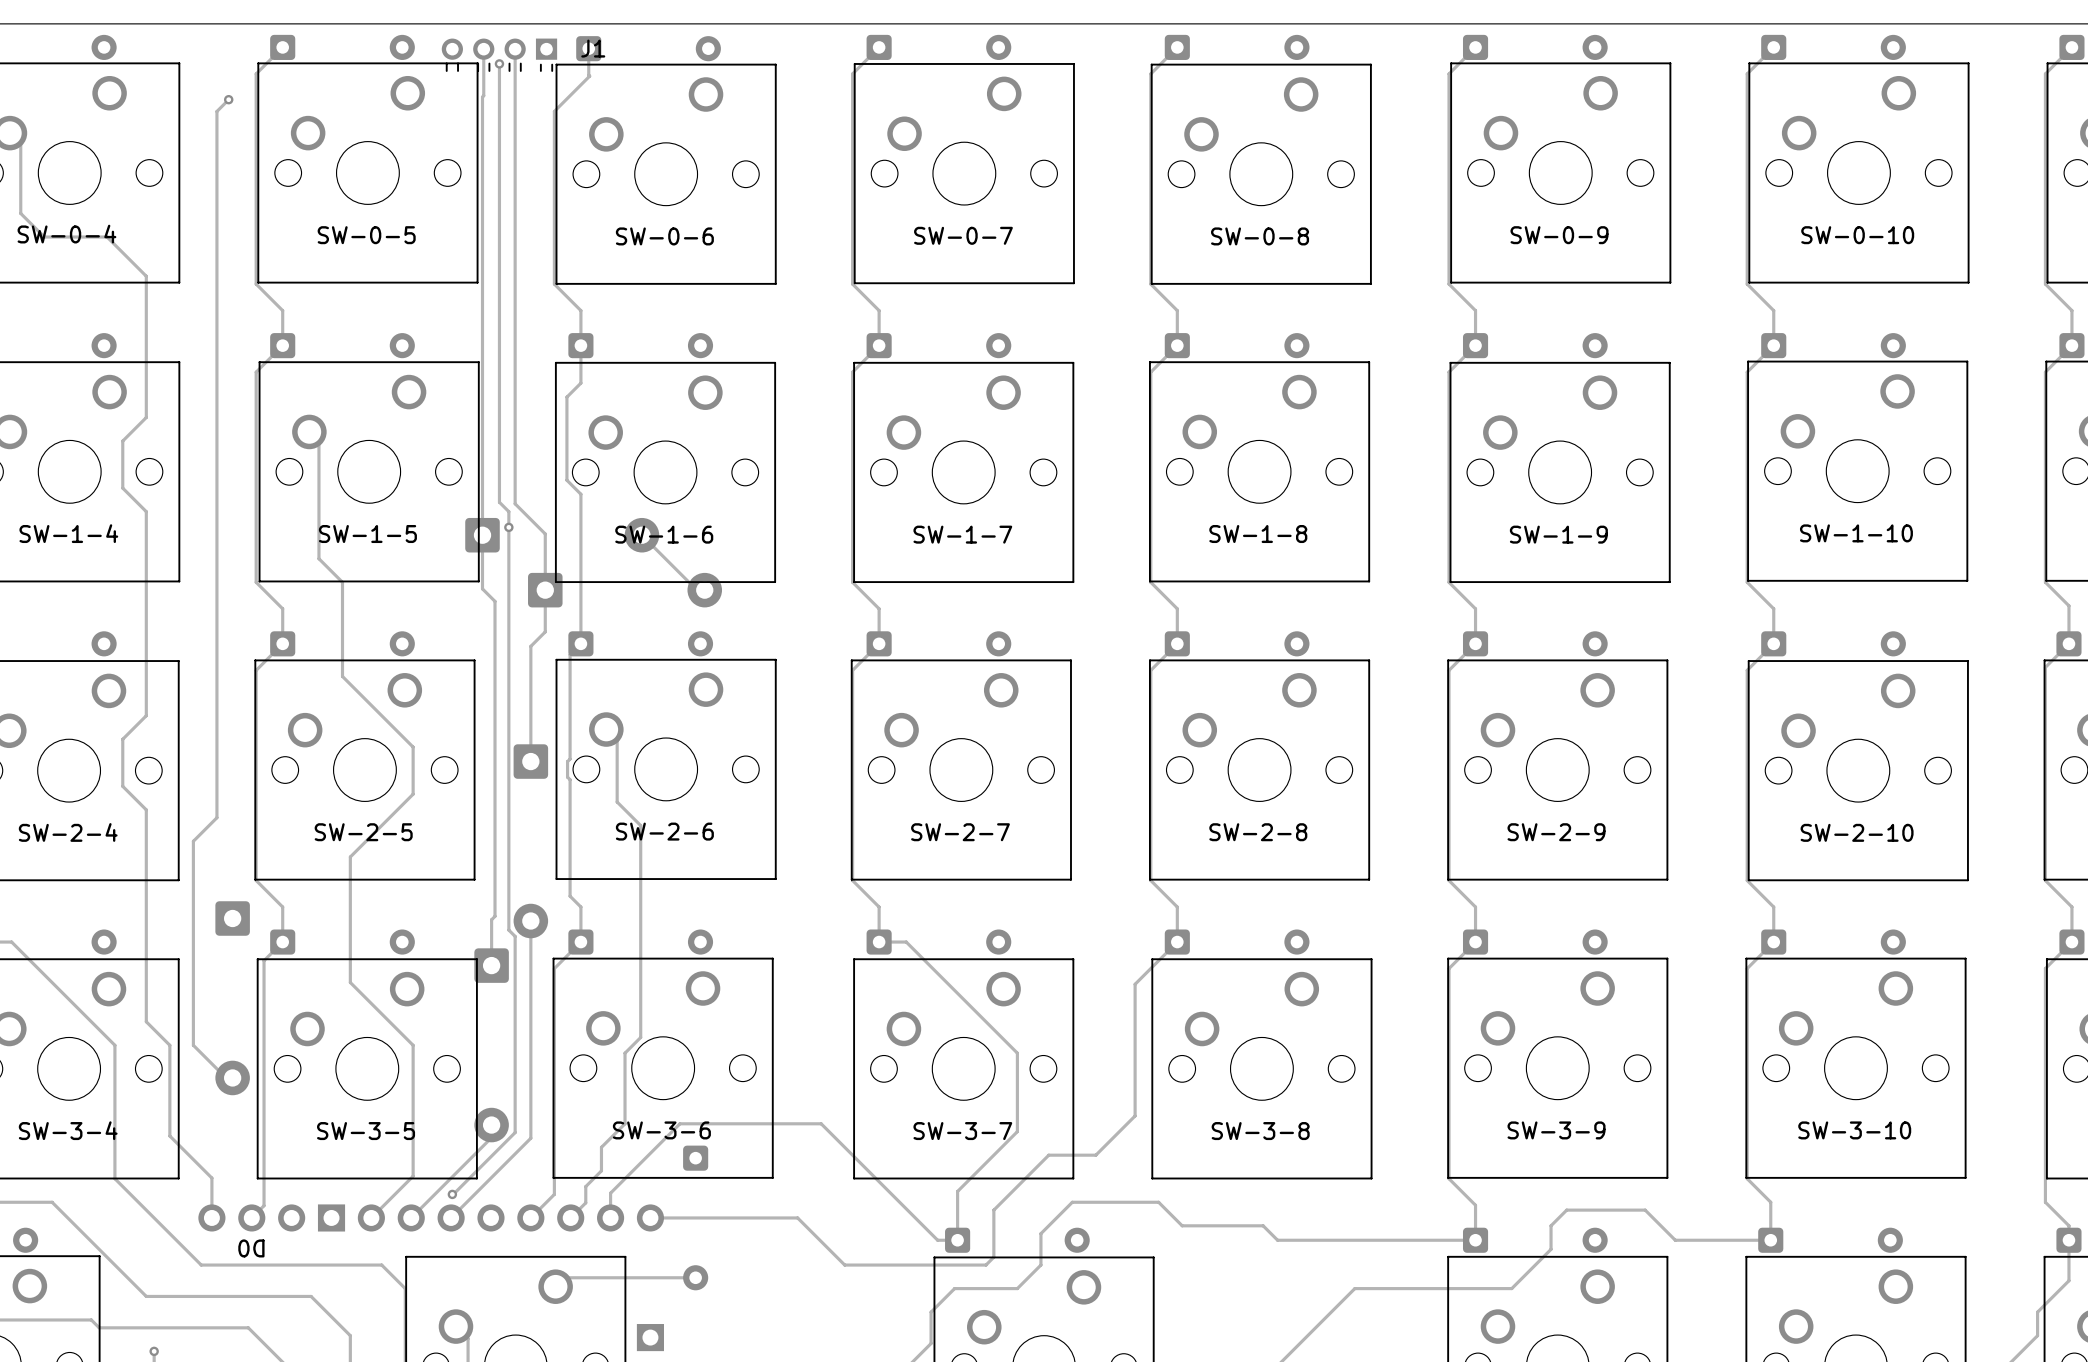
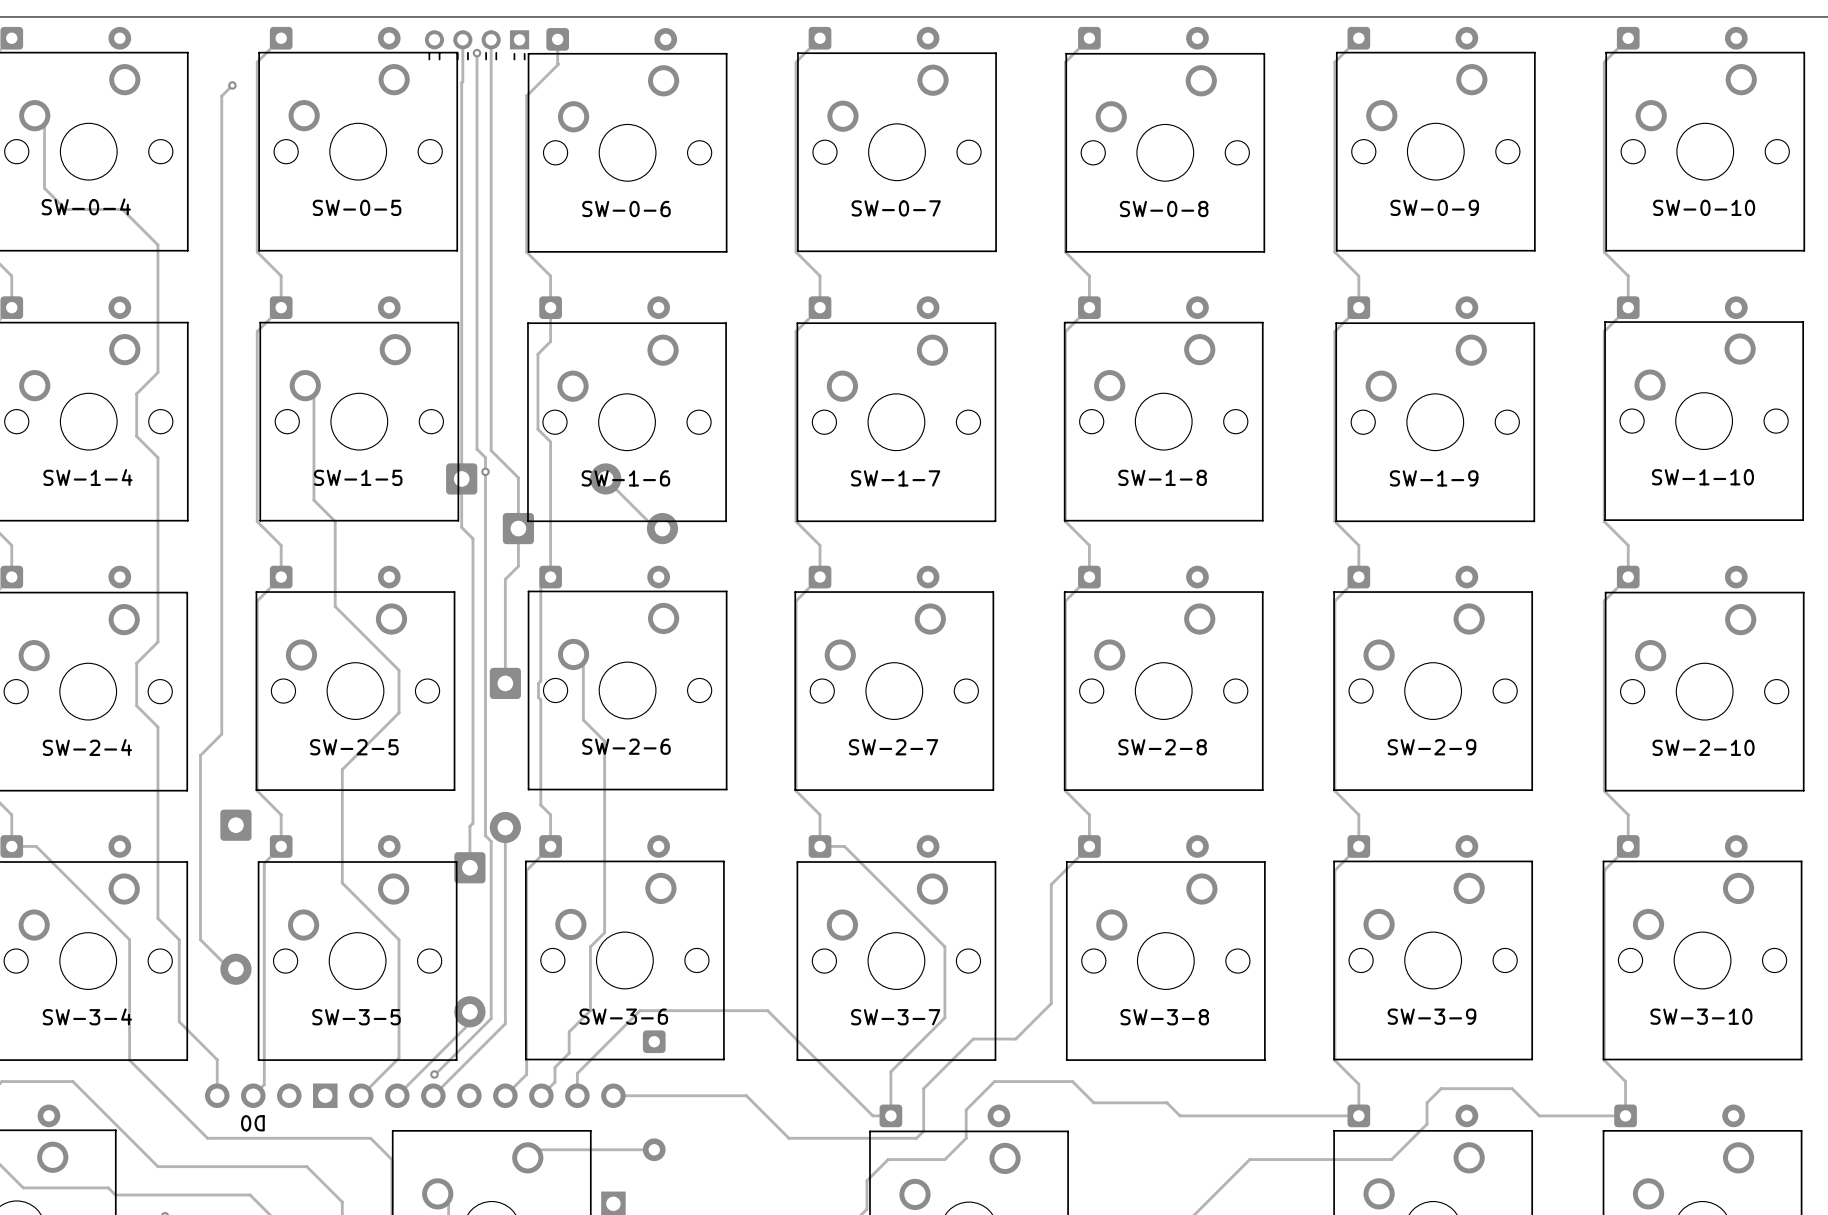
J1 name: J1 (593, 48) -> none

